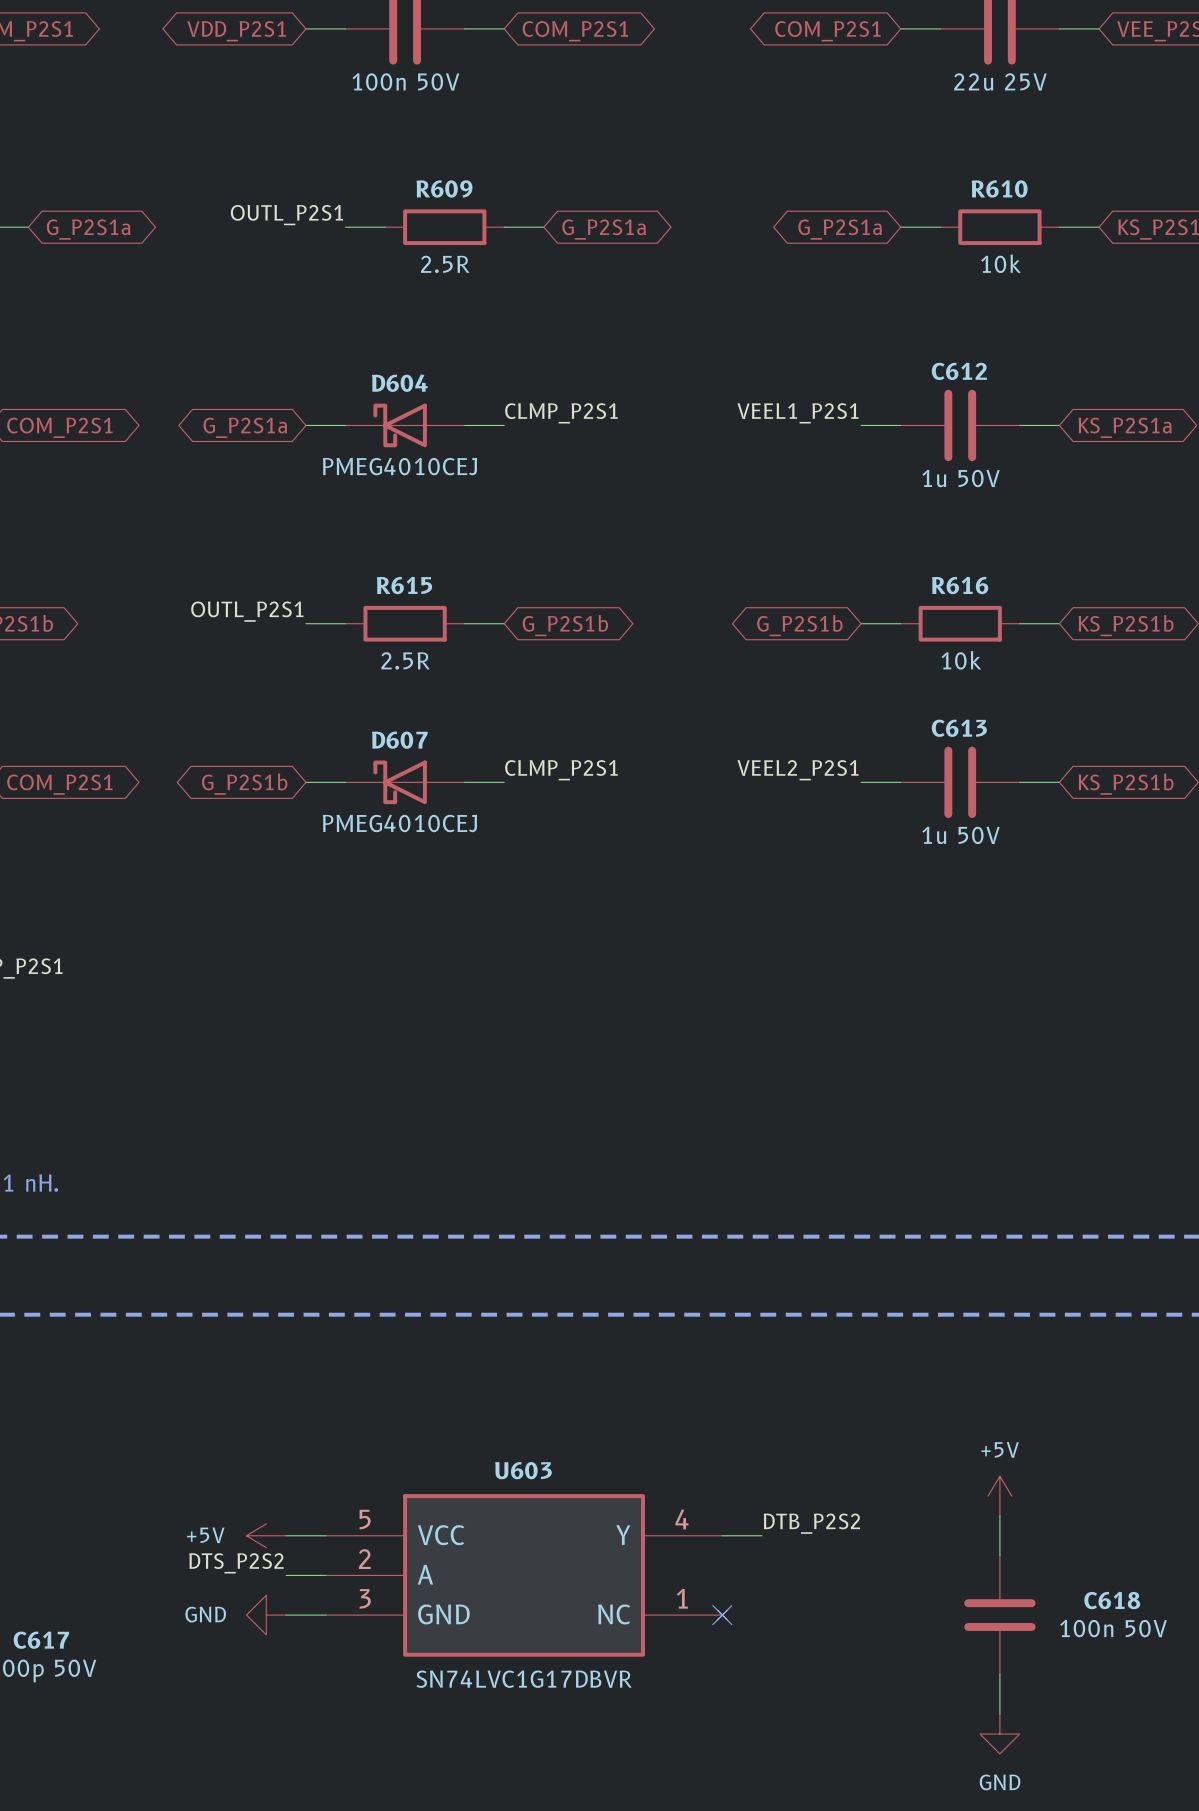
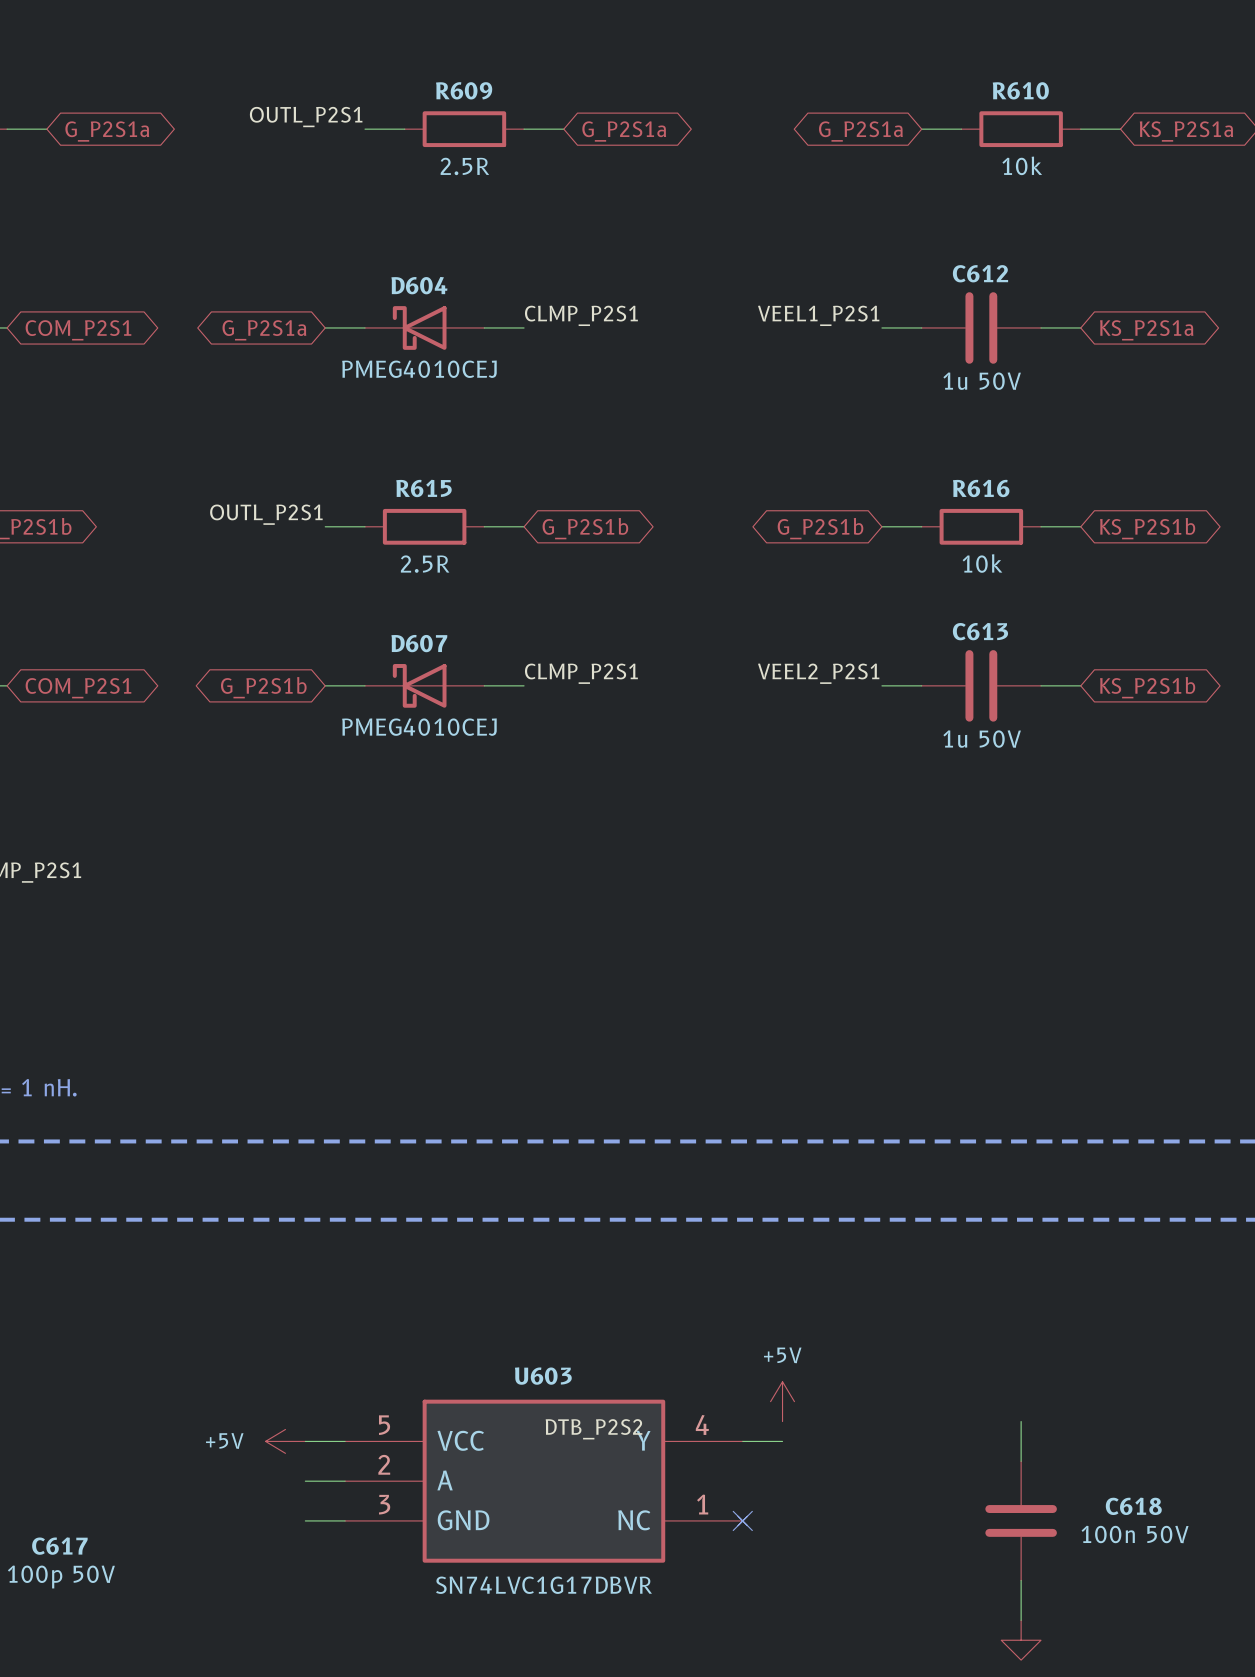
power symbol: none -> +5V (782, 1401)
power symbol: +5V (999, 1496) -> none
label position: DTB_P2S2 (811, 1523) -> DTB_P2S2 (594, 1429)
label: DTS_P2S2 (236, 1563) -> none
power symbol: GND (266, 1615) -> none

